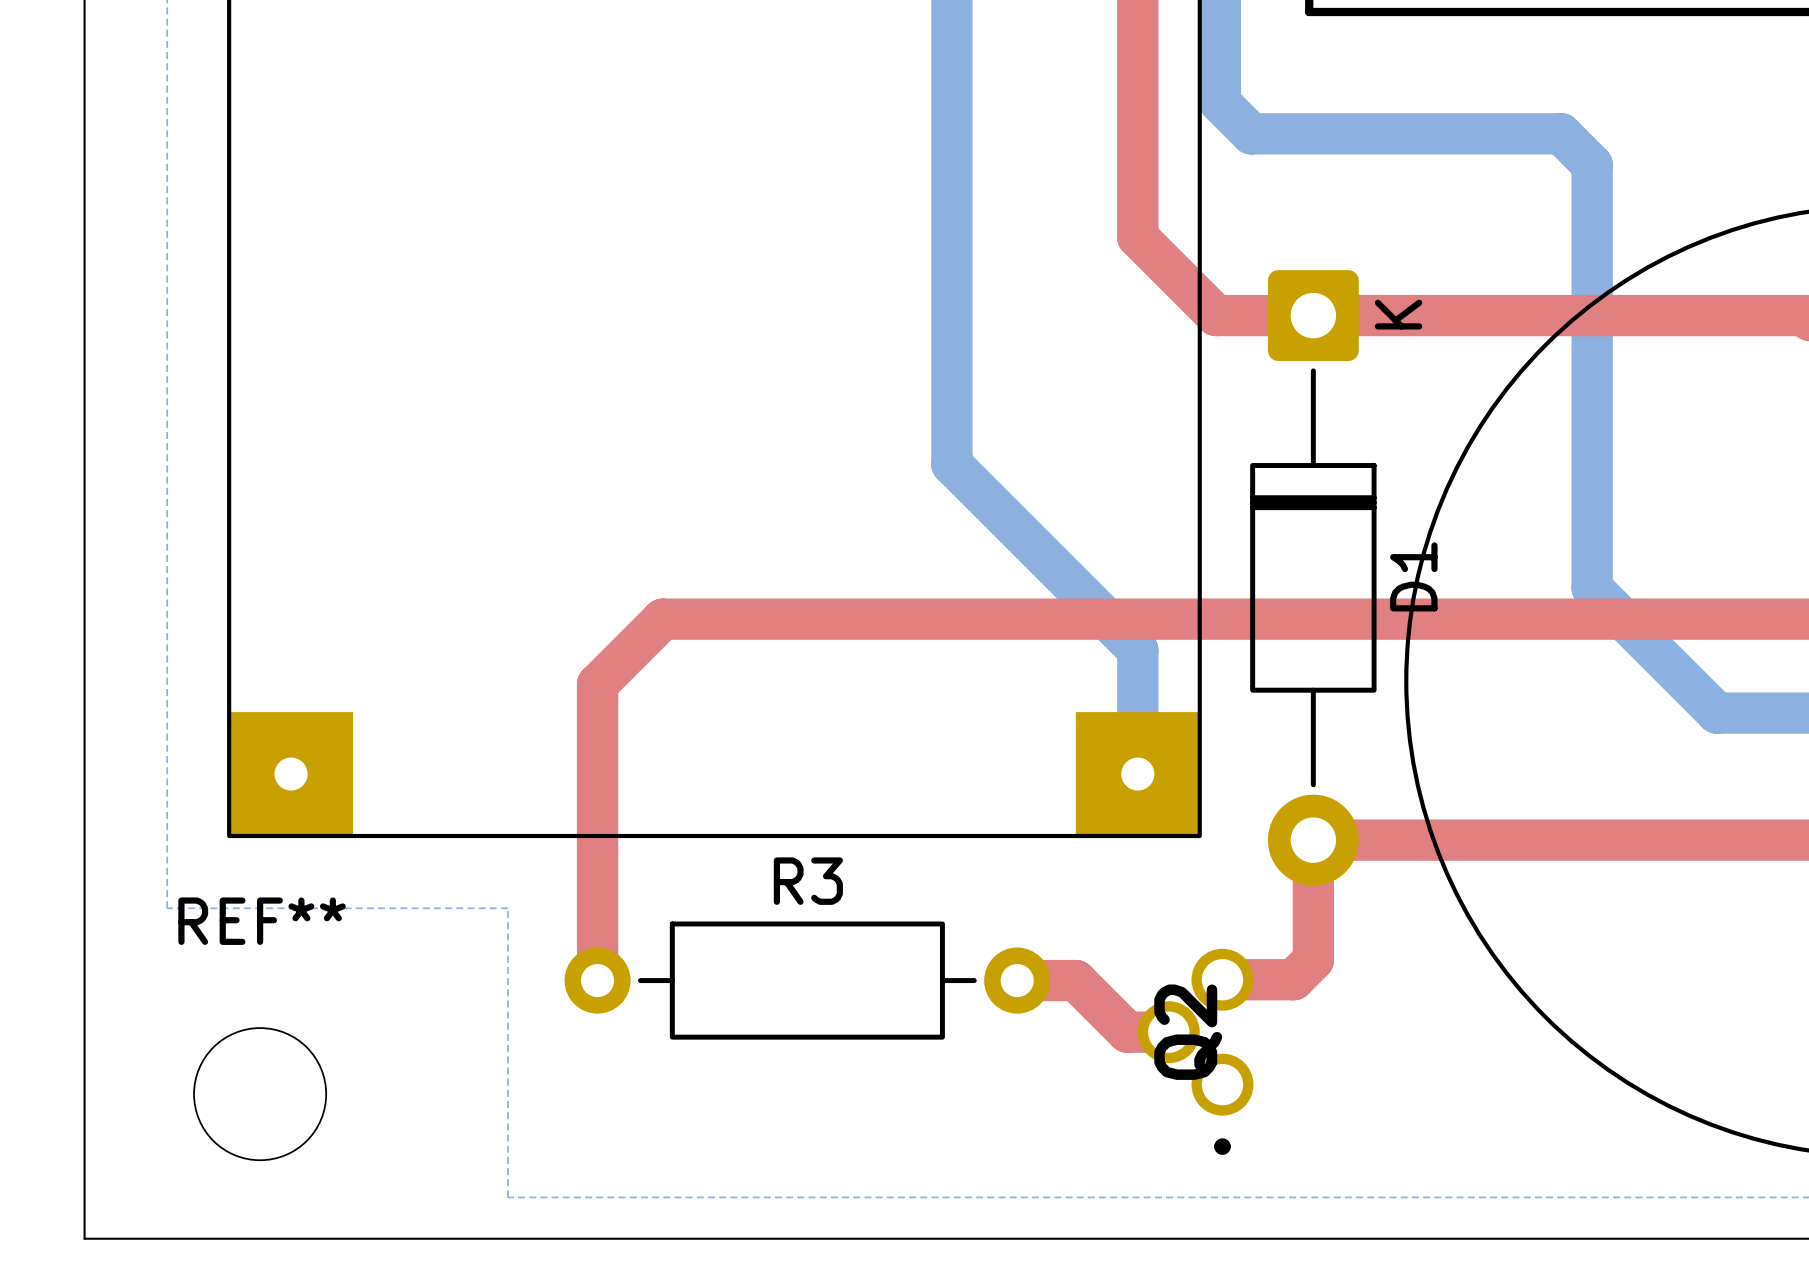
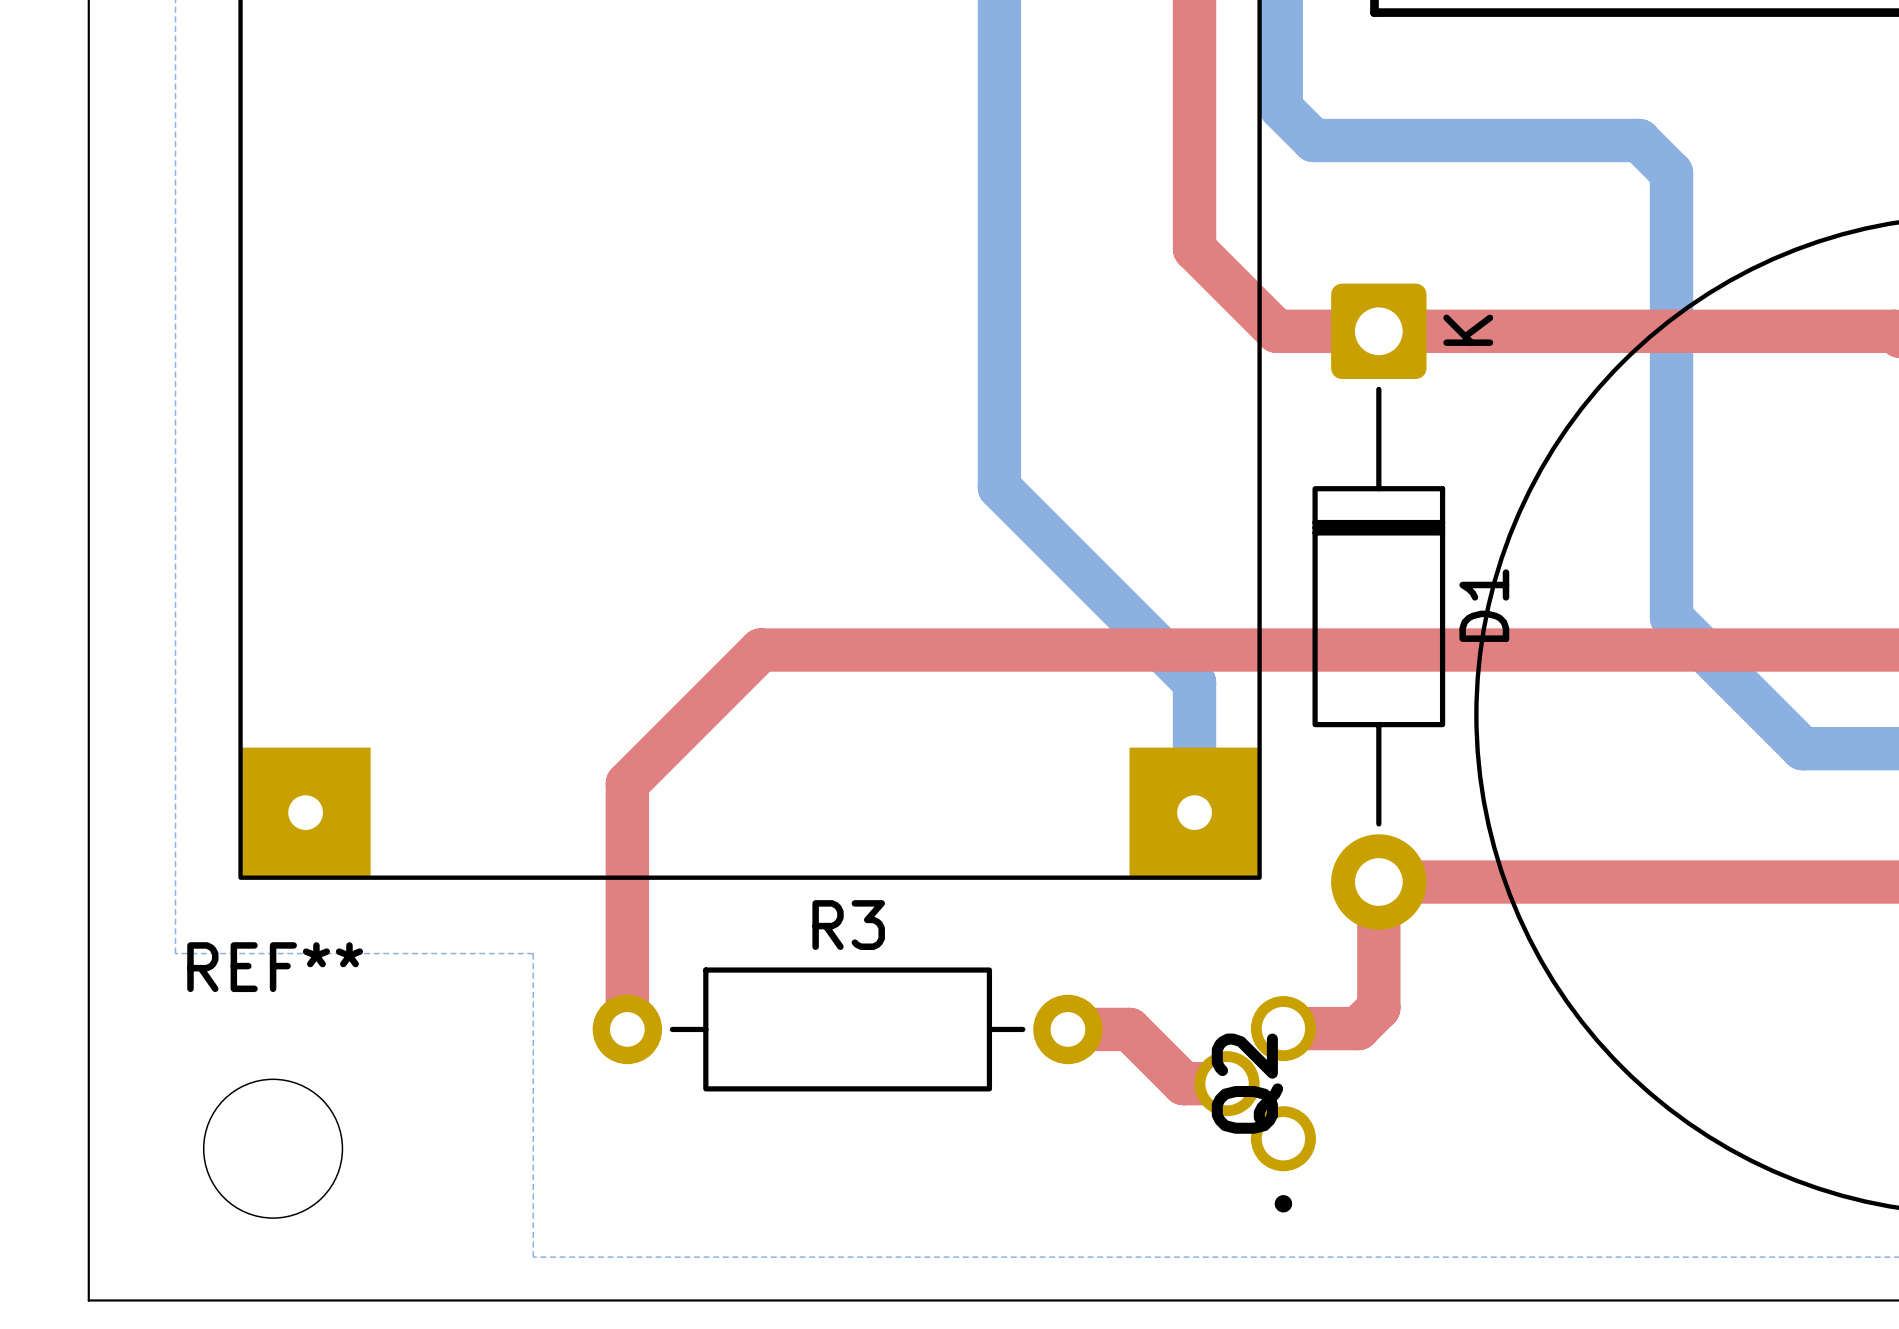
top track: (724, 619) (662, 619) (597, 684) (597, 746) -> (760, 650) (627, 783)

